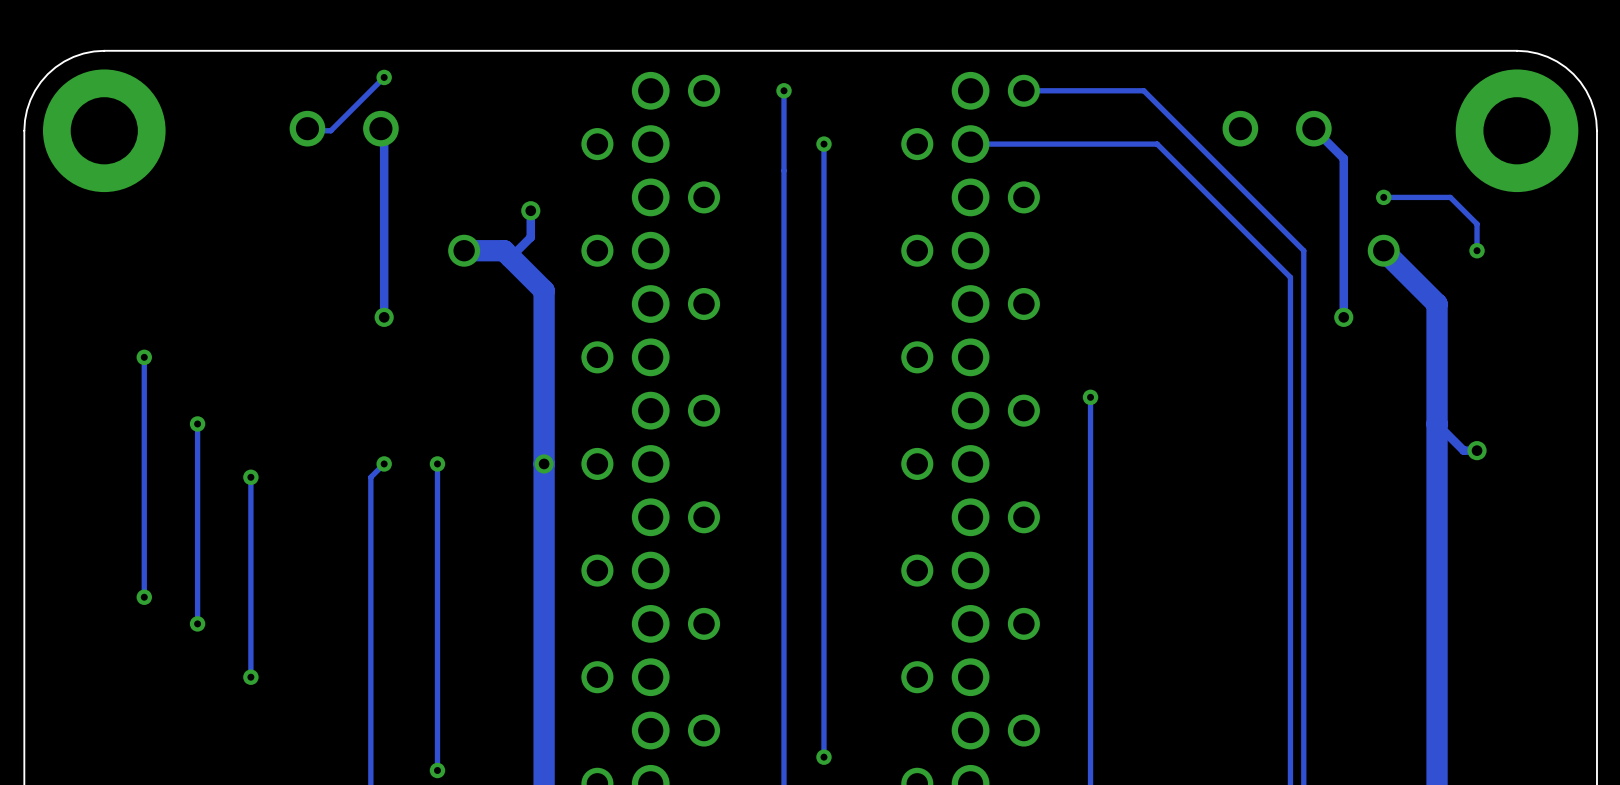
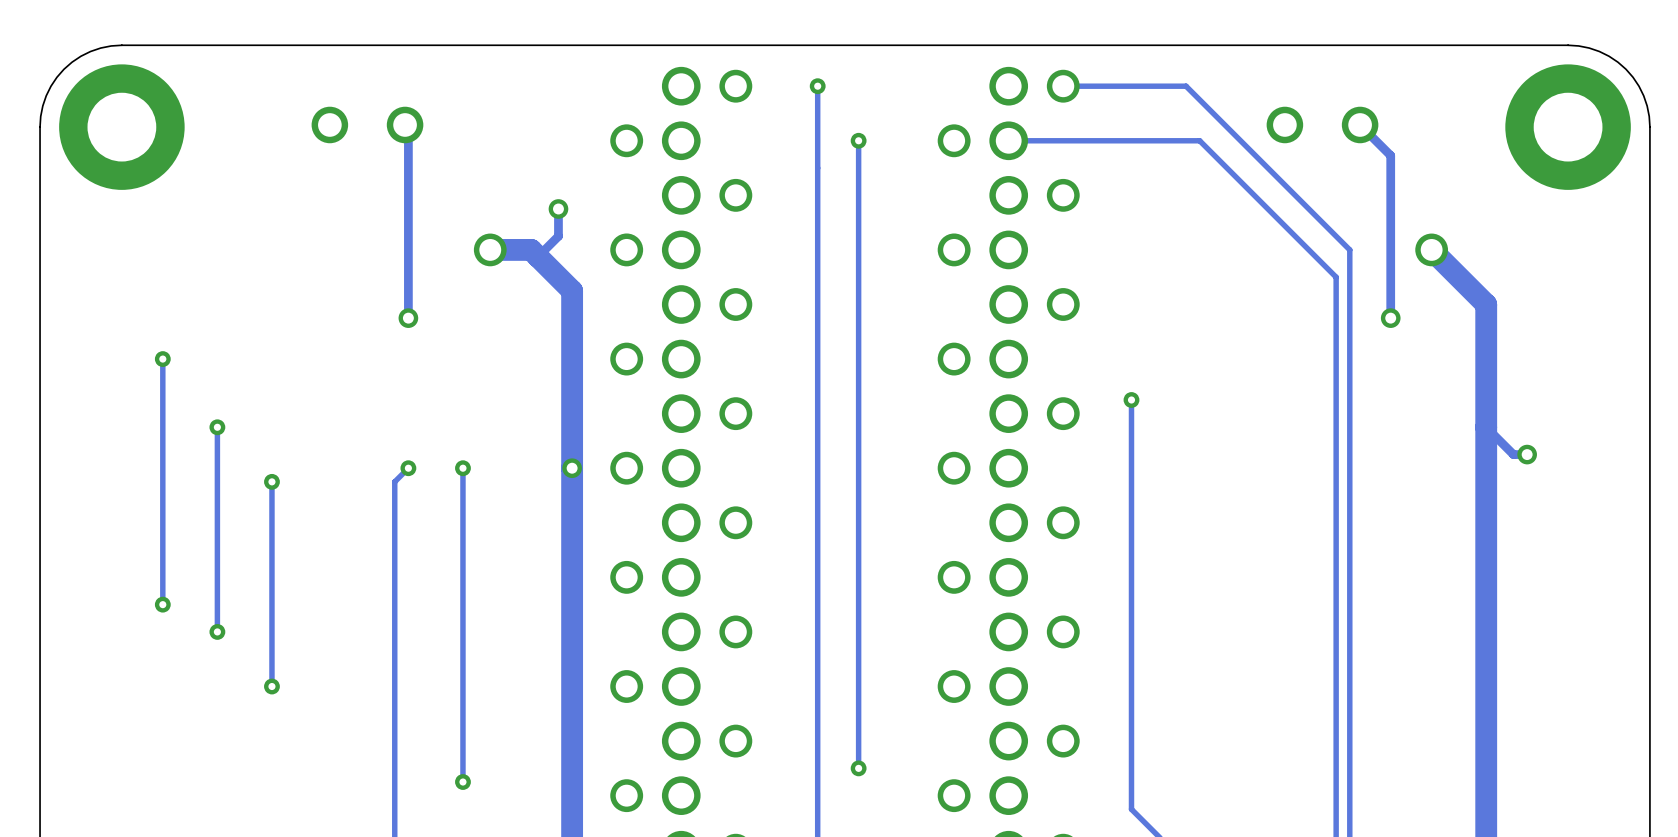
track: (384, 77) (330, 130) (309, 130) (307, 128) -> none
via: (384, 77) -> none
track: (1383, 197) (1450, 197) (1477, 224) (1477, 250) -> none
via: (1383, 197) -> none
via: (1477, 250) -> none

